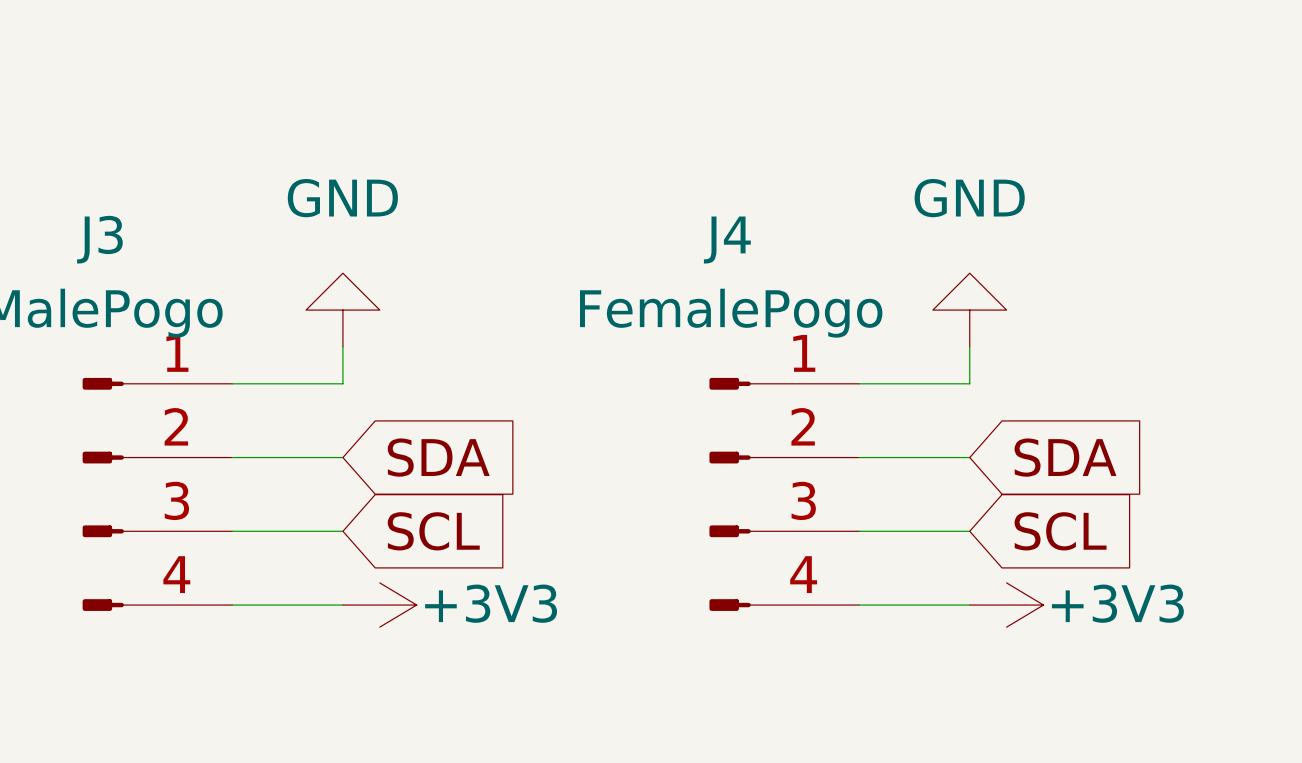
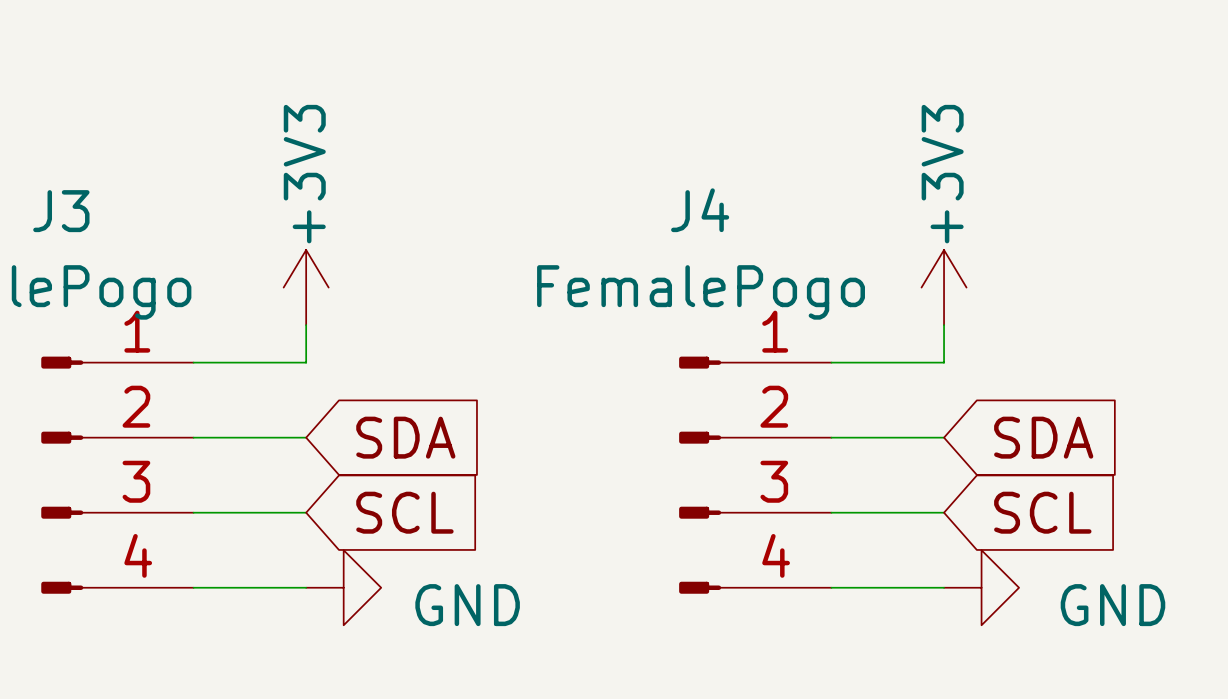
power symbol: GND (342, 310) -> +3V3 (306, 287)
power symbol: GND (969, 310) -> +3V3 (944, 287)
power symbol: +3V3 (379, 605) -> GND (343, 587)
power symbol: +3V3 (1006, 605) -> GND (981, 587)

